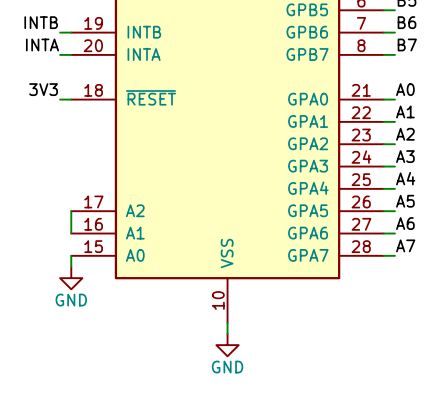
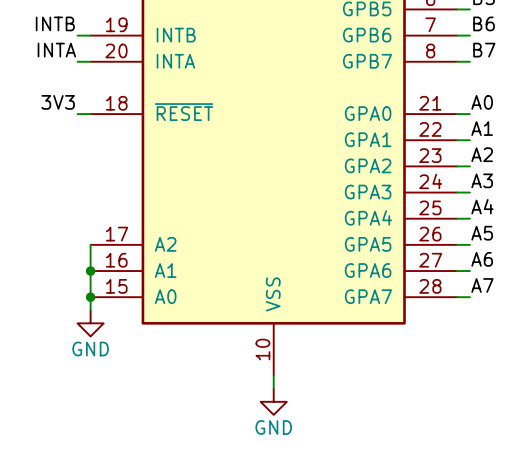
wire: none -> (90, 271) (90, 297)
junction: none -> (90, 271)
junction: none -> (90, 297)

